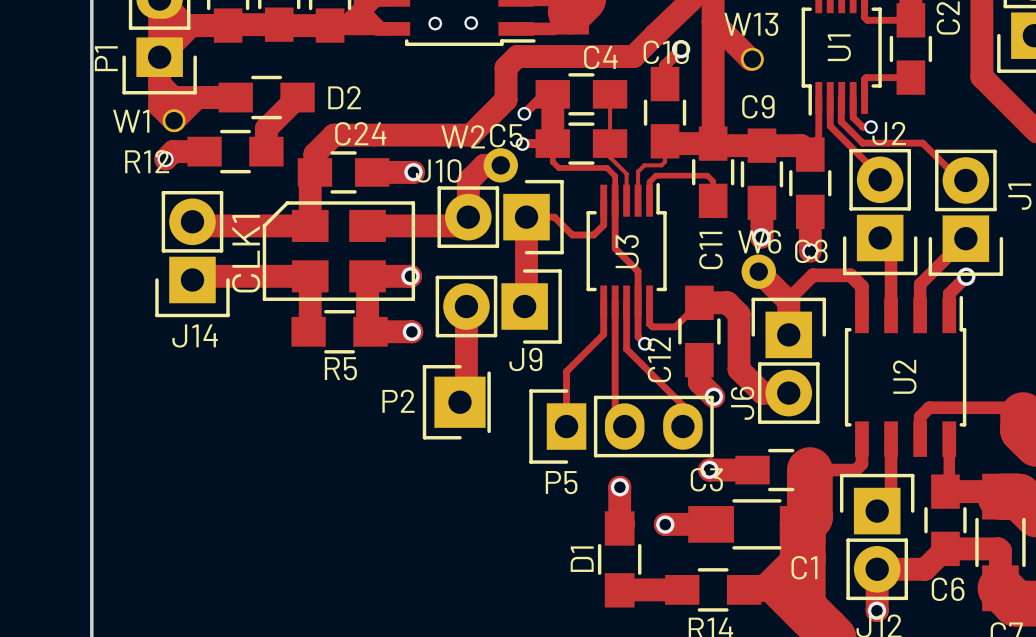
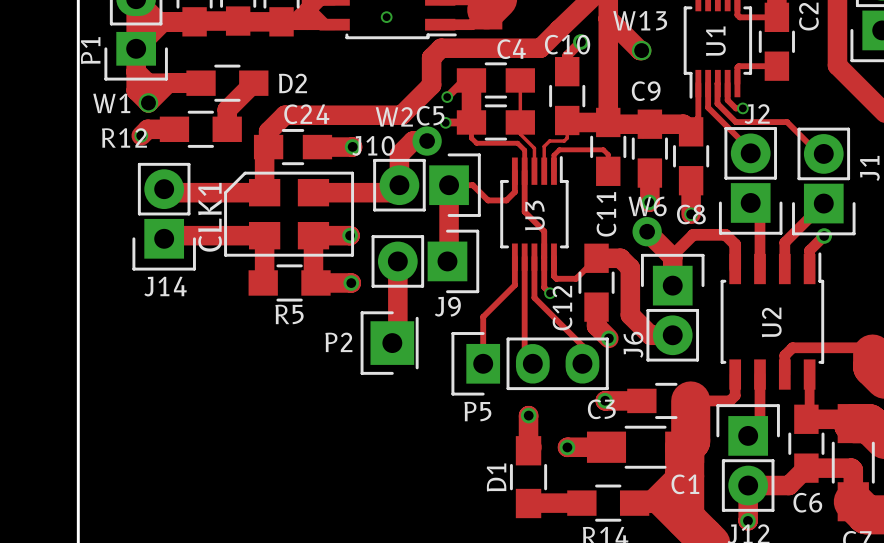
via: none -> (386, 17)
via: (435, 23) -> none
via: (471, 23) -> none

